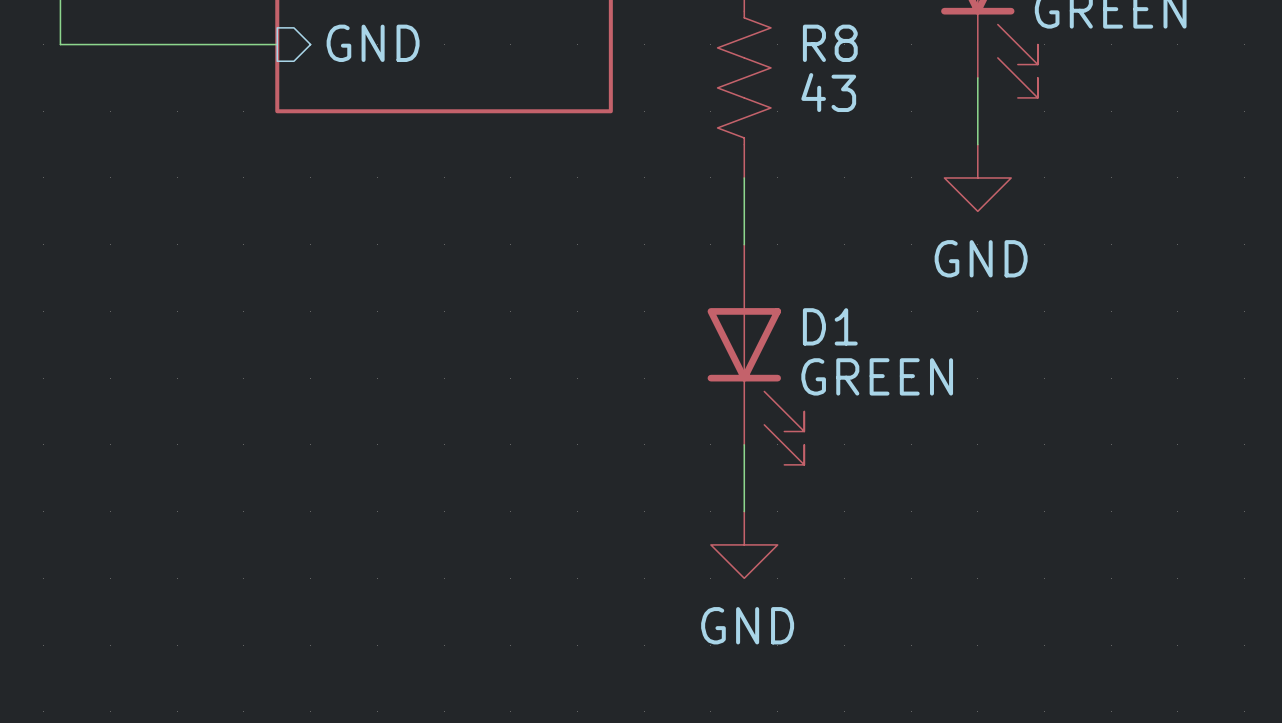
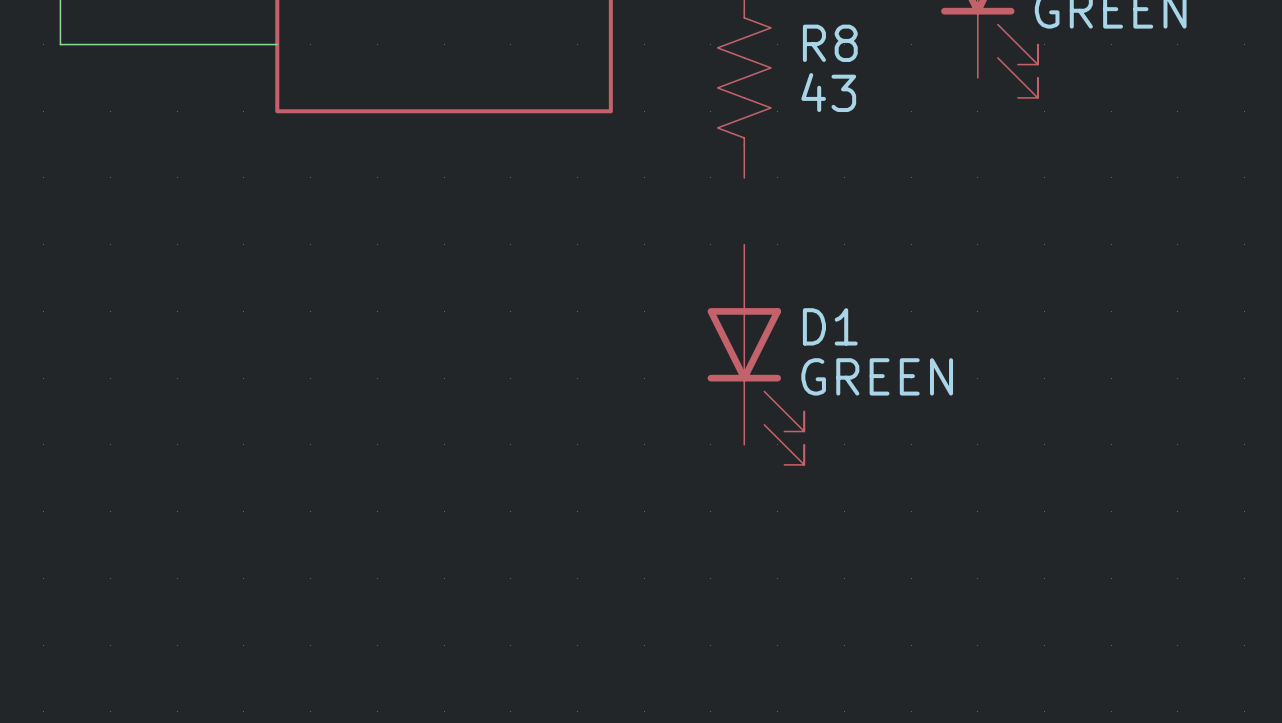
sheet pin: GND (373, 43) -> none
wire: (977, 77) (977, 144) -> none
wire: (744, 177) (744, 244) -> none
power symbol: GND (977, 177) -> none
wire: (744, 444) (744, 511) -> none
power symbol: GND (744, 544) -> none

